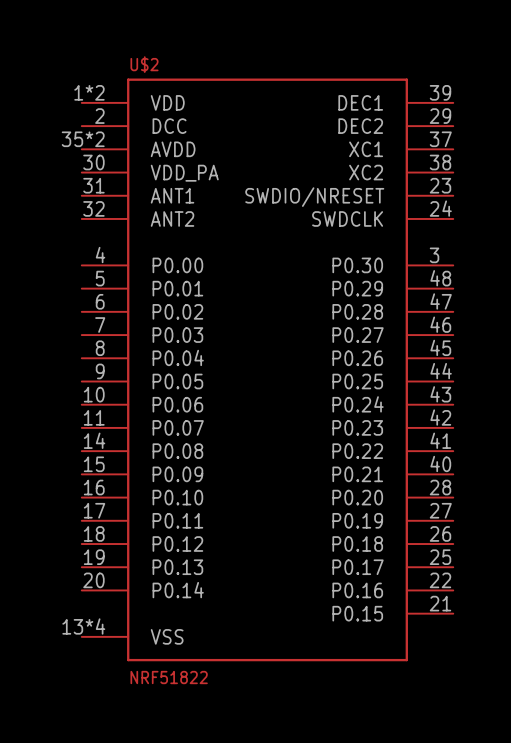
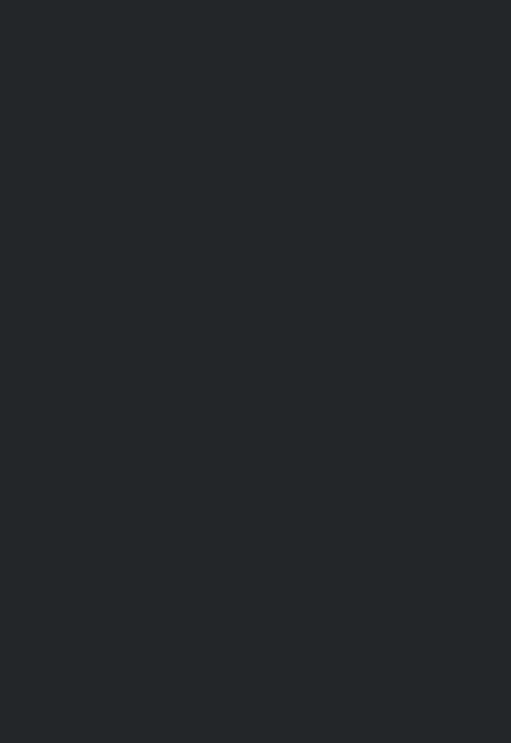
U$2: NRF51822 (267, 369) -> none

